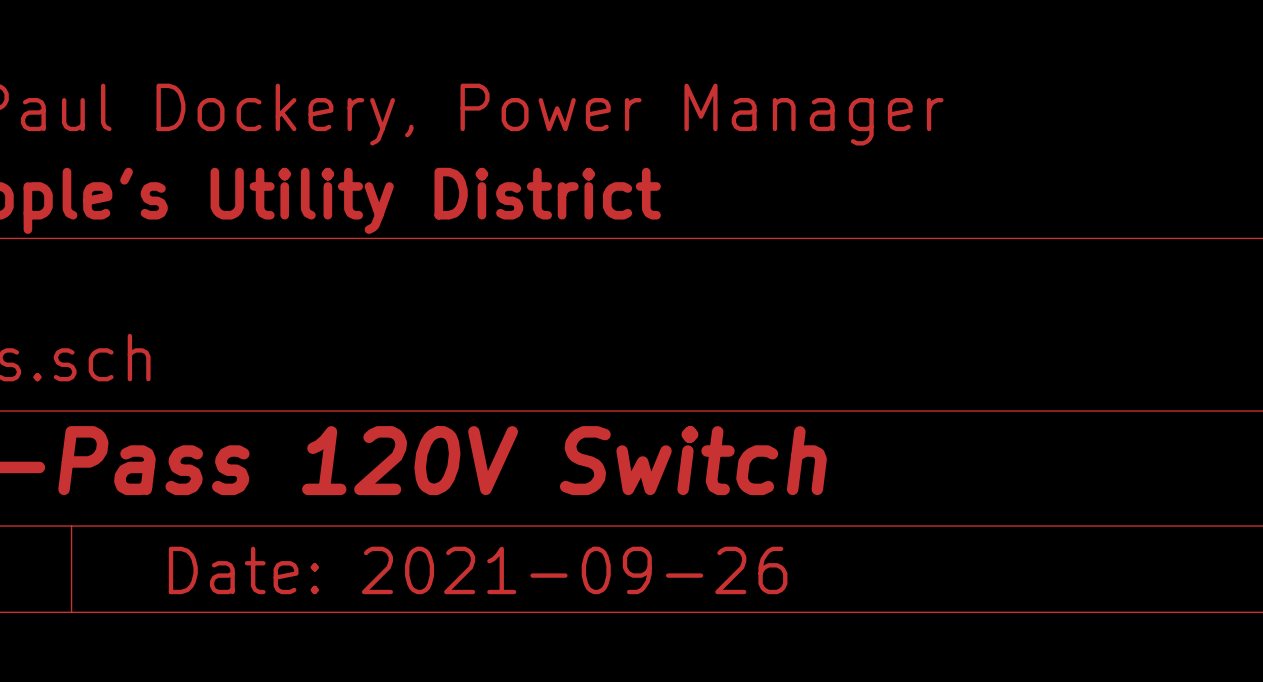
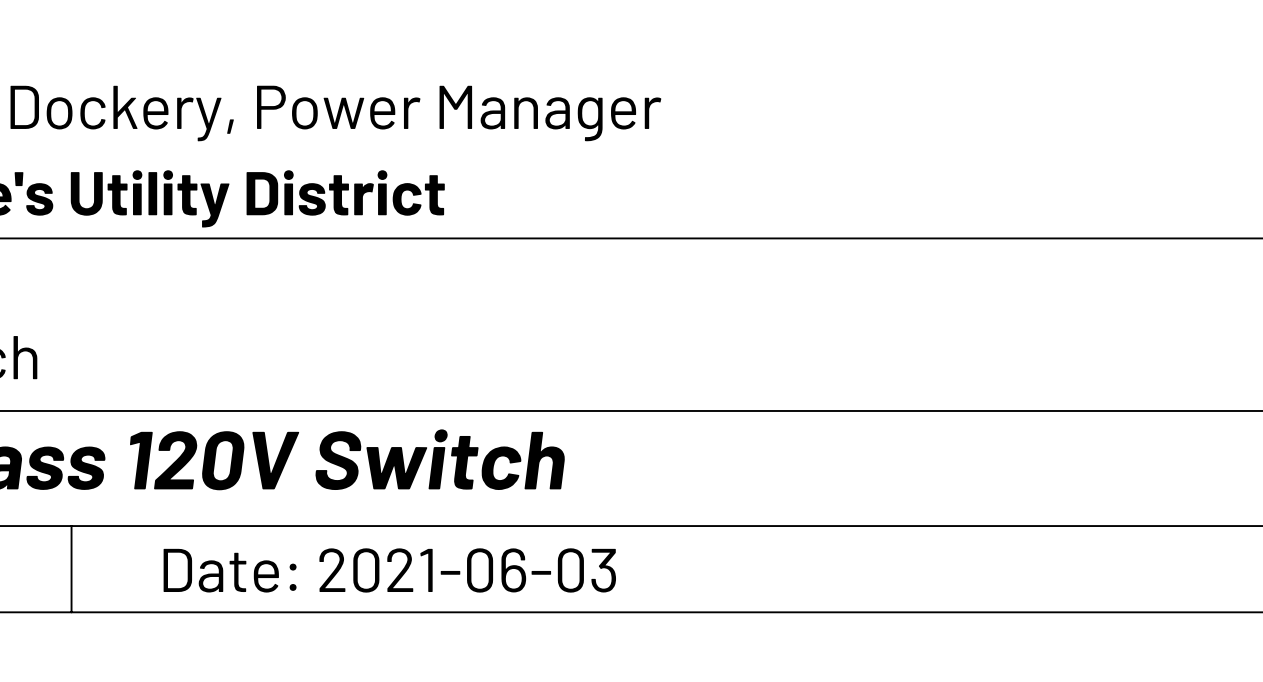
title block: Date: 2021-09-26 (478, 570) -> Date: 2021-06-03 (389, 570)

